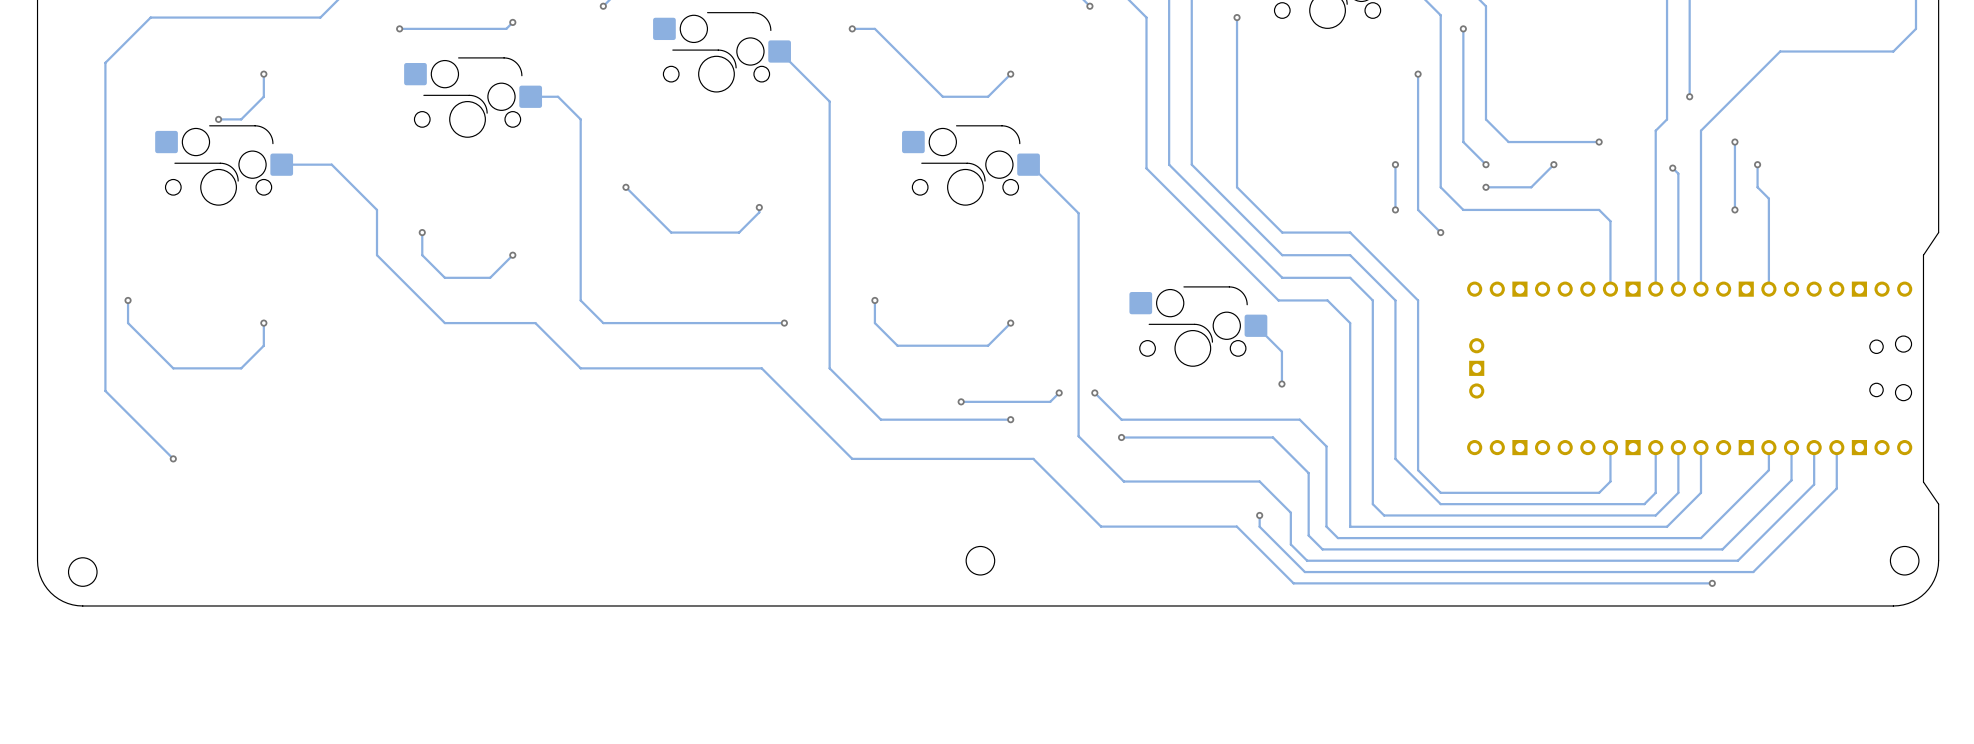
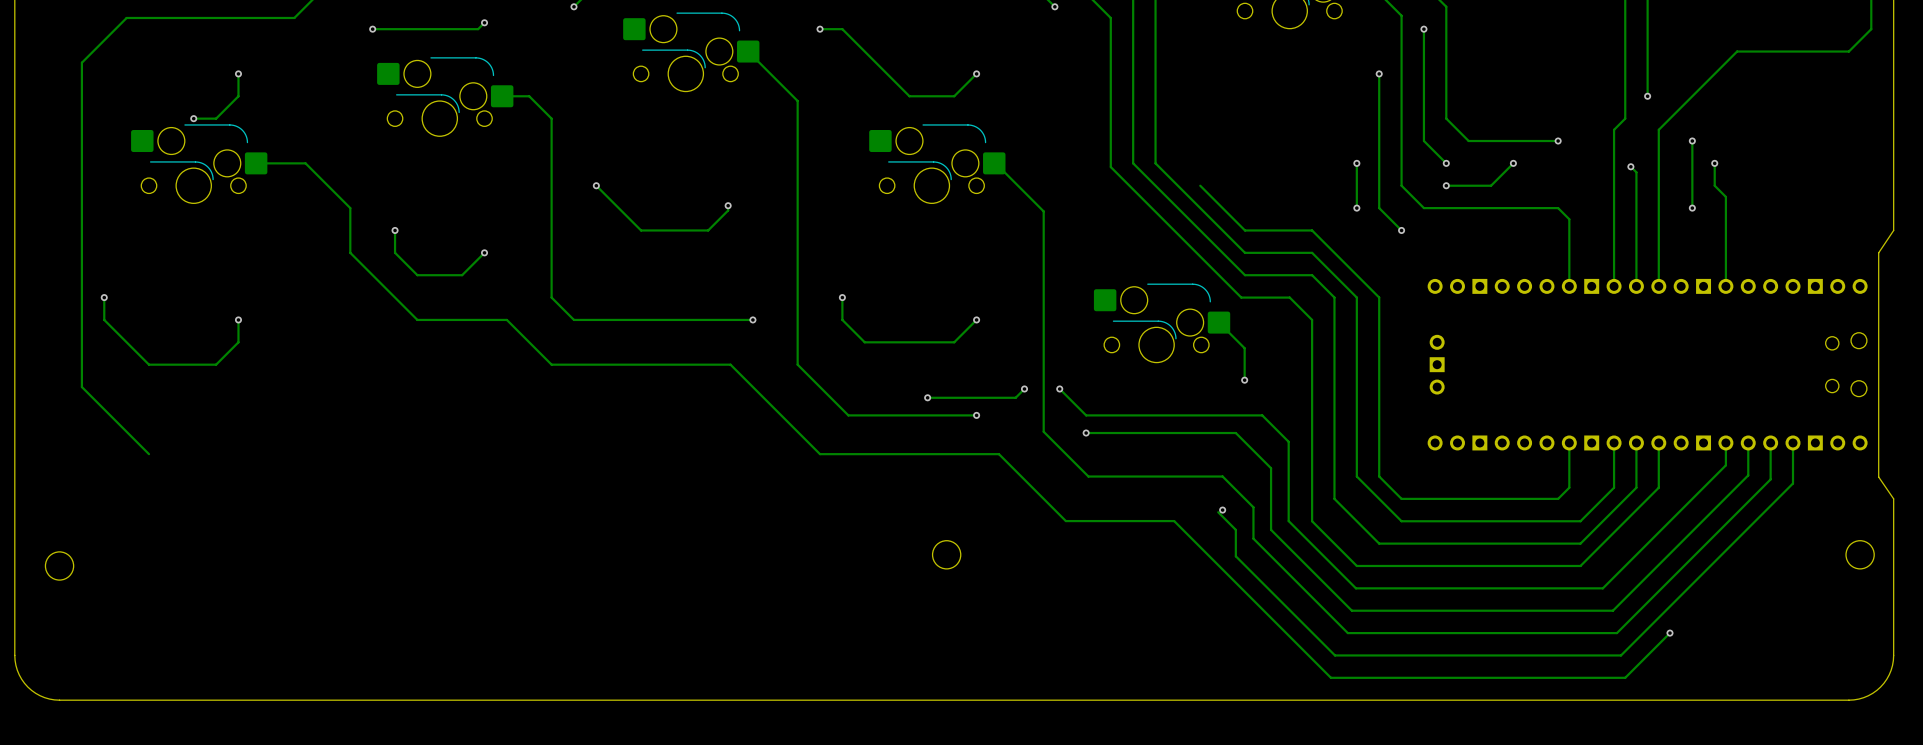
track: (1237, 17) (1237, 187) -> none
via: (1237, 17) -> none
via: (173, 458) -> none
track: (1395, 458) (1418, 481) -> (1379, 465) (1379, 476)
track: none -> (1356, 454) (1356, 476) (1401, 521)
track: (1418, 470) (1440, 492) (1599, 492) (1610, 481) -> (1558, 498) (1569, 487) (1569, 476)
track: (1644, 504) (1599, 504) -> (1602, 498) (1580, 521)
track: (1259, 515) (1259, 526) (1304, 572) (1395, 572) -> none
track: (1655, 515) (1384, 515) -> none
track: (1210, 526) (1236, 526) (1293, 583) (1712, 583) -> (1174, 521) (1330, 677) (1625, 677) (1669, 633)
track: (1440, 526) (1350, 526) -> (1356, 565) (1312, 521)
track: (1667, 526) (1621, 526) -> (1625, 521) (1580, 565)
track: (1700, 538) (1337, 538) -> (1658, 532) (1602, 588) (1355, 588) (1300, 532)
track: (1418, 549) (1322, 549) -> (1379, 543) (1345, 510)
track: (1722, 549) (1621, 549) -> (1614, 510) (1580, 543)
track: none -> (1680, 543) (1612, 610) (1351, 610) (1284, 543)
track: (1737, 560) (1307, 560) -> (1695, 554) (1616, 633) (1347, 633) (1269, 554)
board edge: (1938, 560) (1936, 575) (1925, 592) (1908, 603) (1893, 605) (82, 605) (67, 603) (50, 592) (42, 580) (37, 560) -> (1893, 554) (1893, 655) (1891, 670) (1886, 679) (1876, 690) (1863, 697) (1848, 700) (54, 699) (40, 695) (31, 690) (21, 679) (15, 665) (14, 554)
track: (1753, 572) (1621, 572) -> (1710, 565) (1621, 655) (1335, 655) (1235, 556) (1235, 529) (1218, 512)
via: (1712, 583) -> none
via: none -> (1669, 633)

